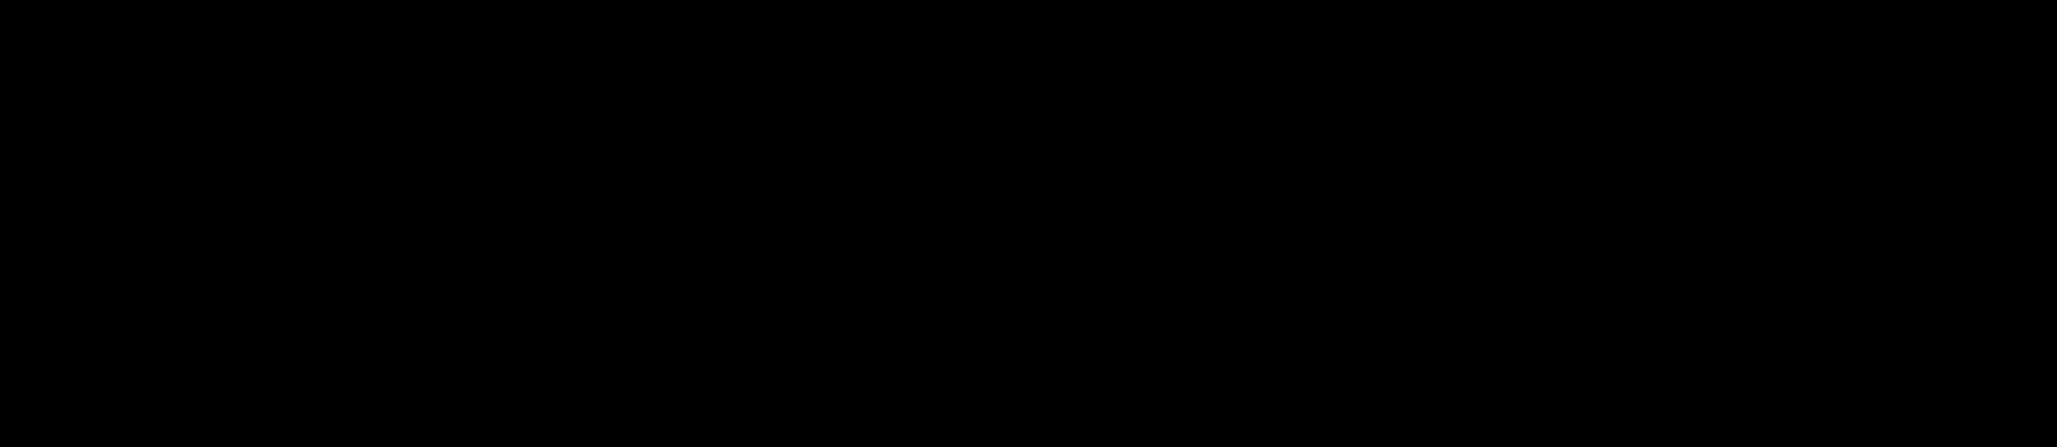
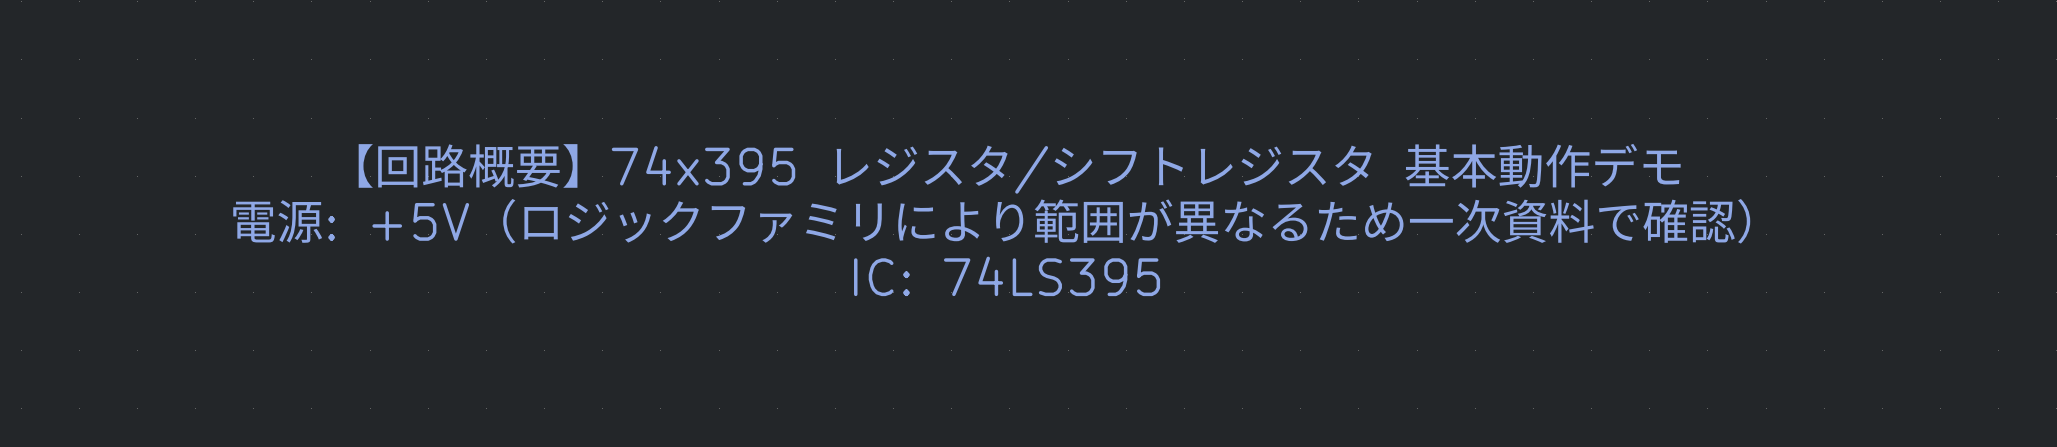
text: none -> 【回路概要】74x395 レジスタ/シフトレジスタ 基本動作デモ (1019, 167)
text: none -> 電源: +5V（ロジックファミリにより範囲が異なるため一次資料で確認） (991, 221)
text: none -> IC: 74LS395 (1007, 276)

